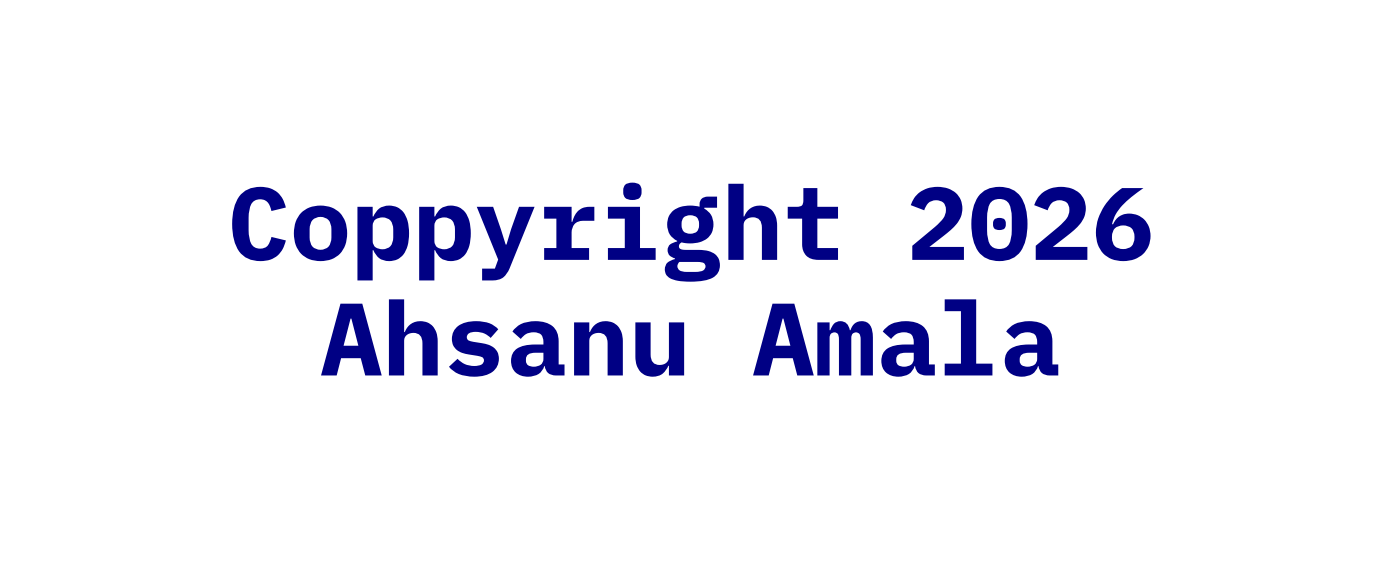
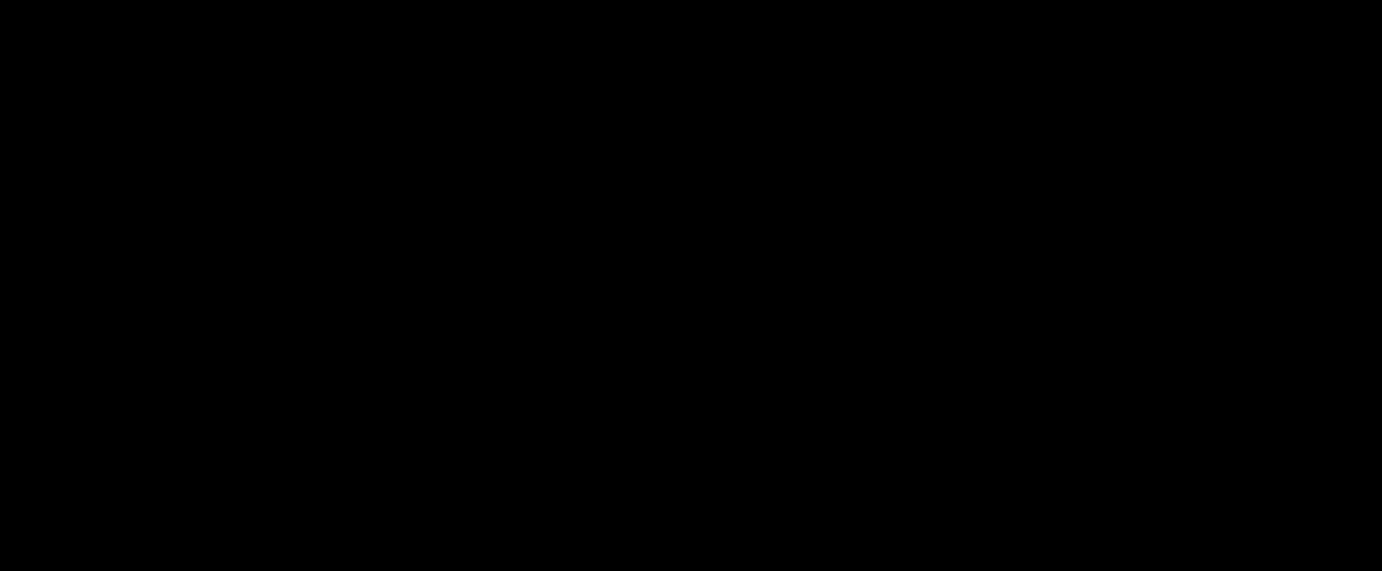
text: Coppyright 2026 (691, 232) -> none
text: Ahsanu Amala (689, 338) -> none

